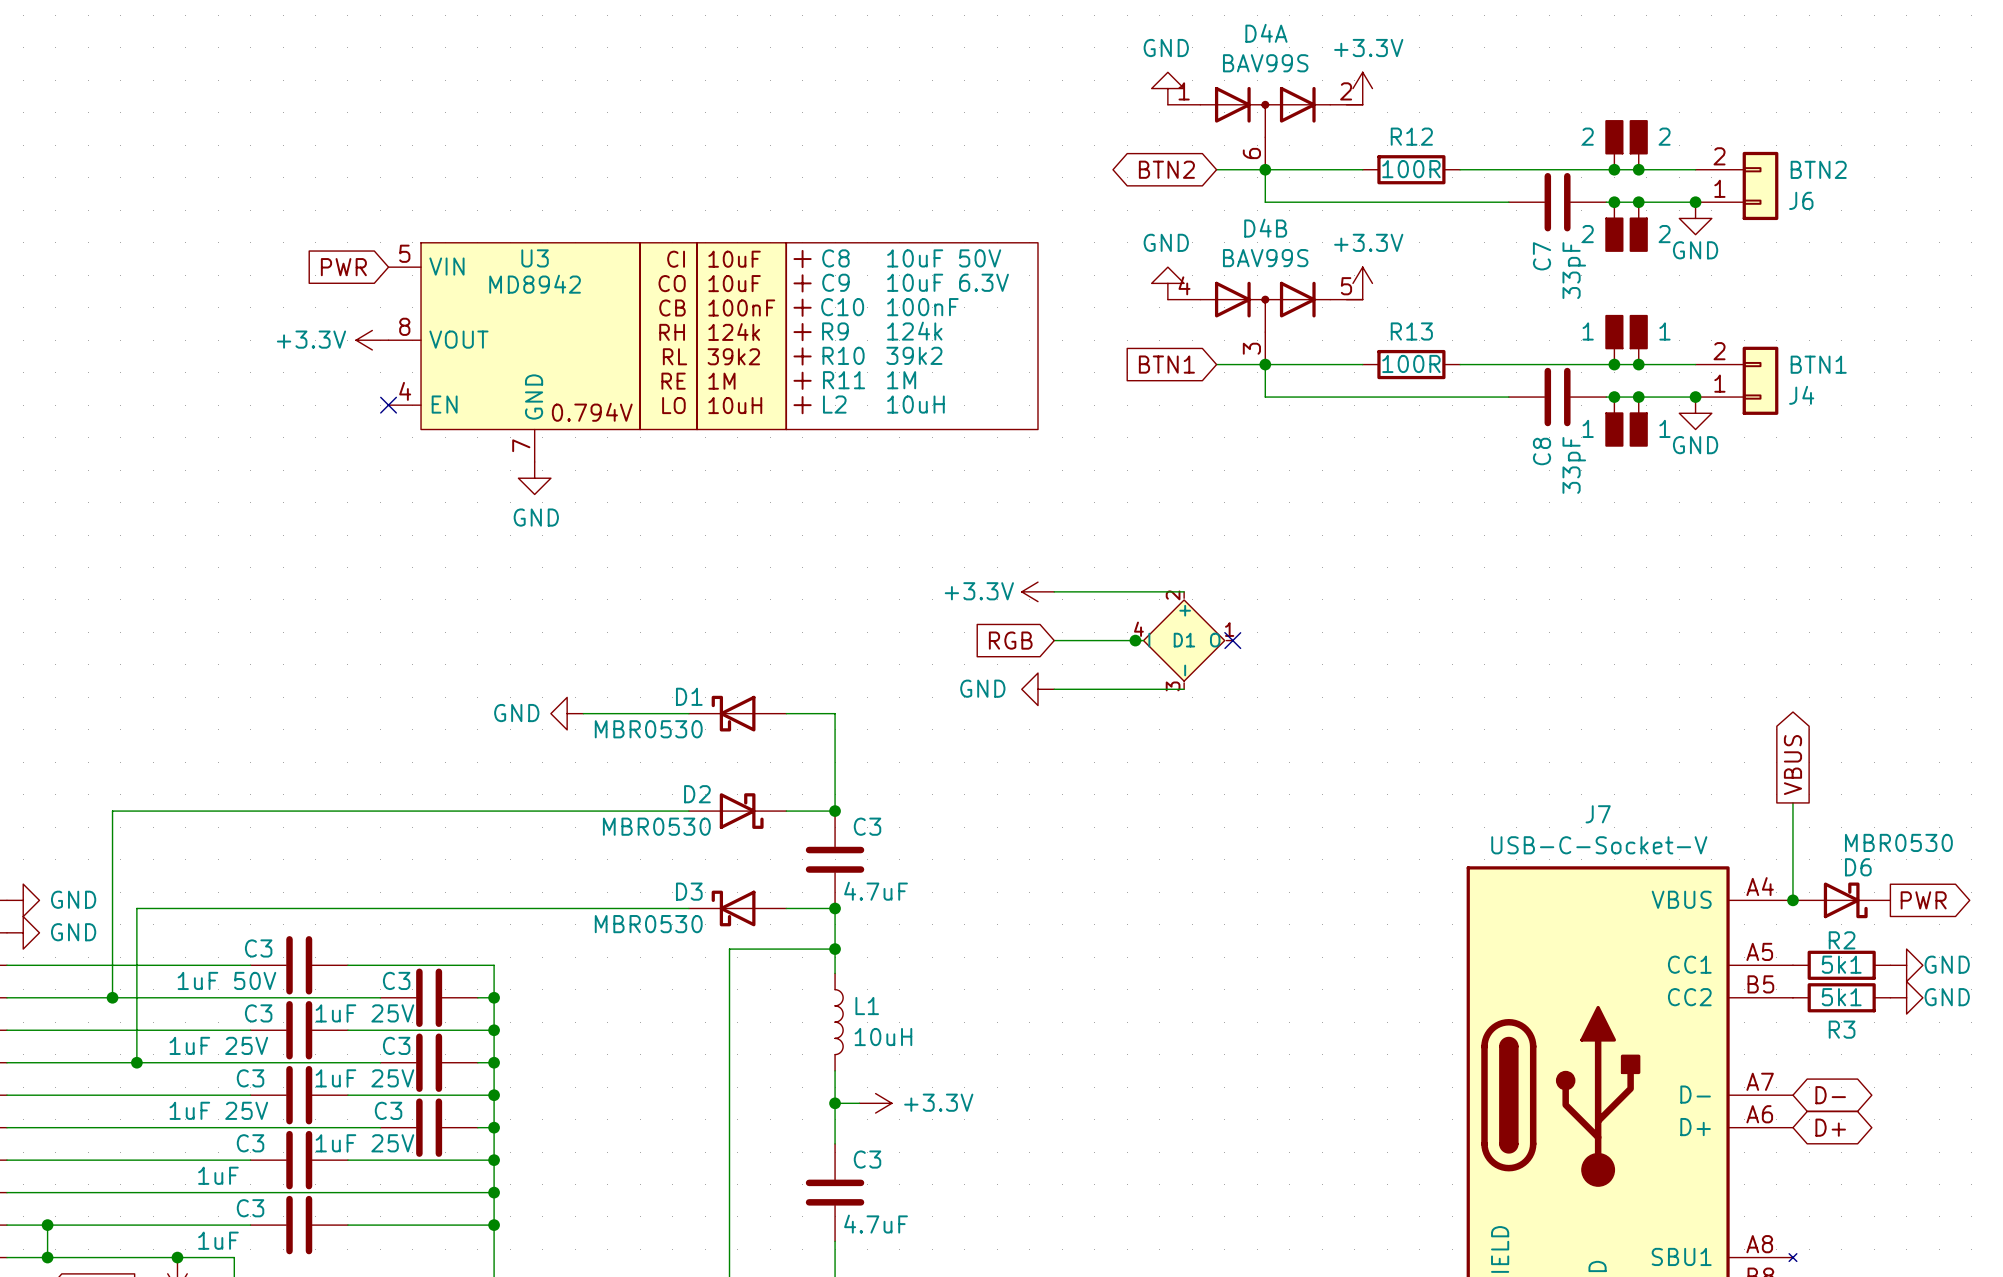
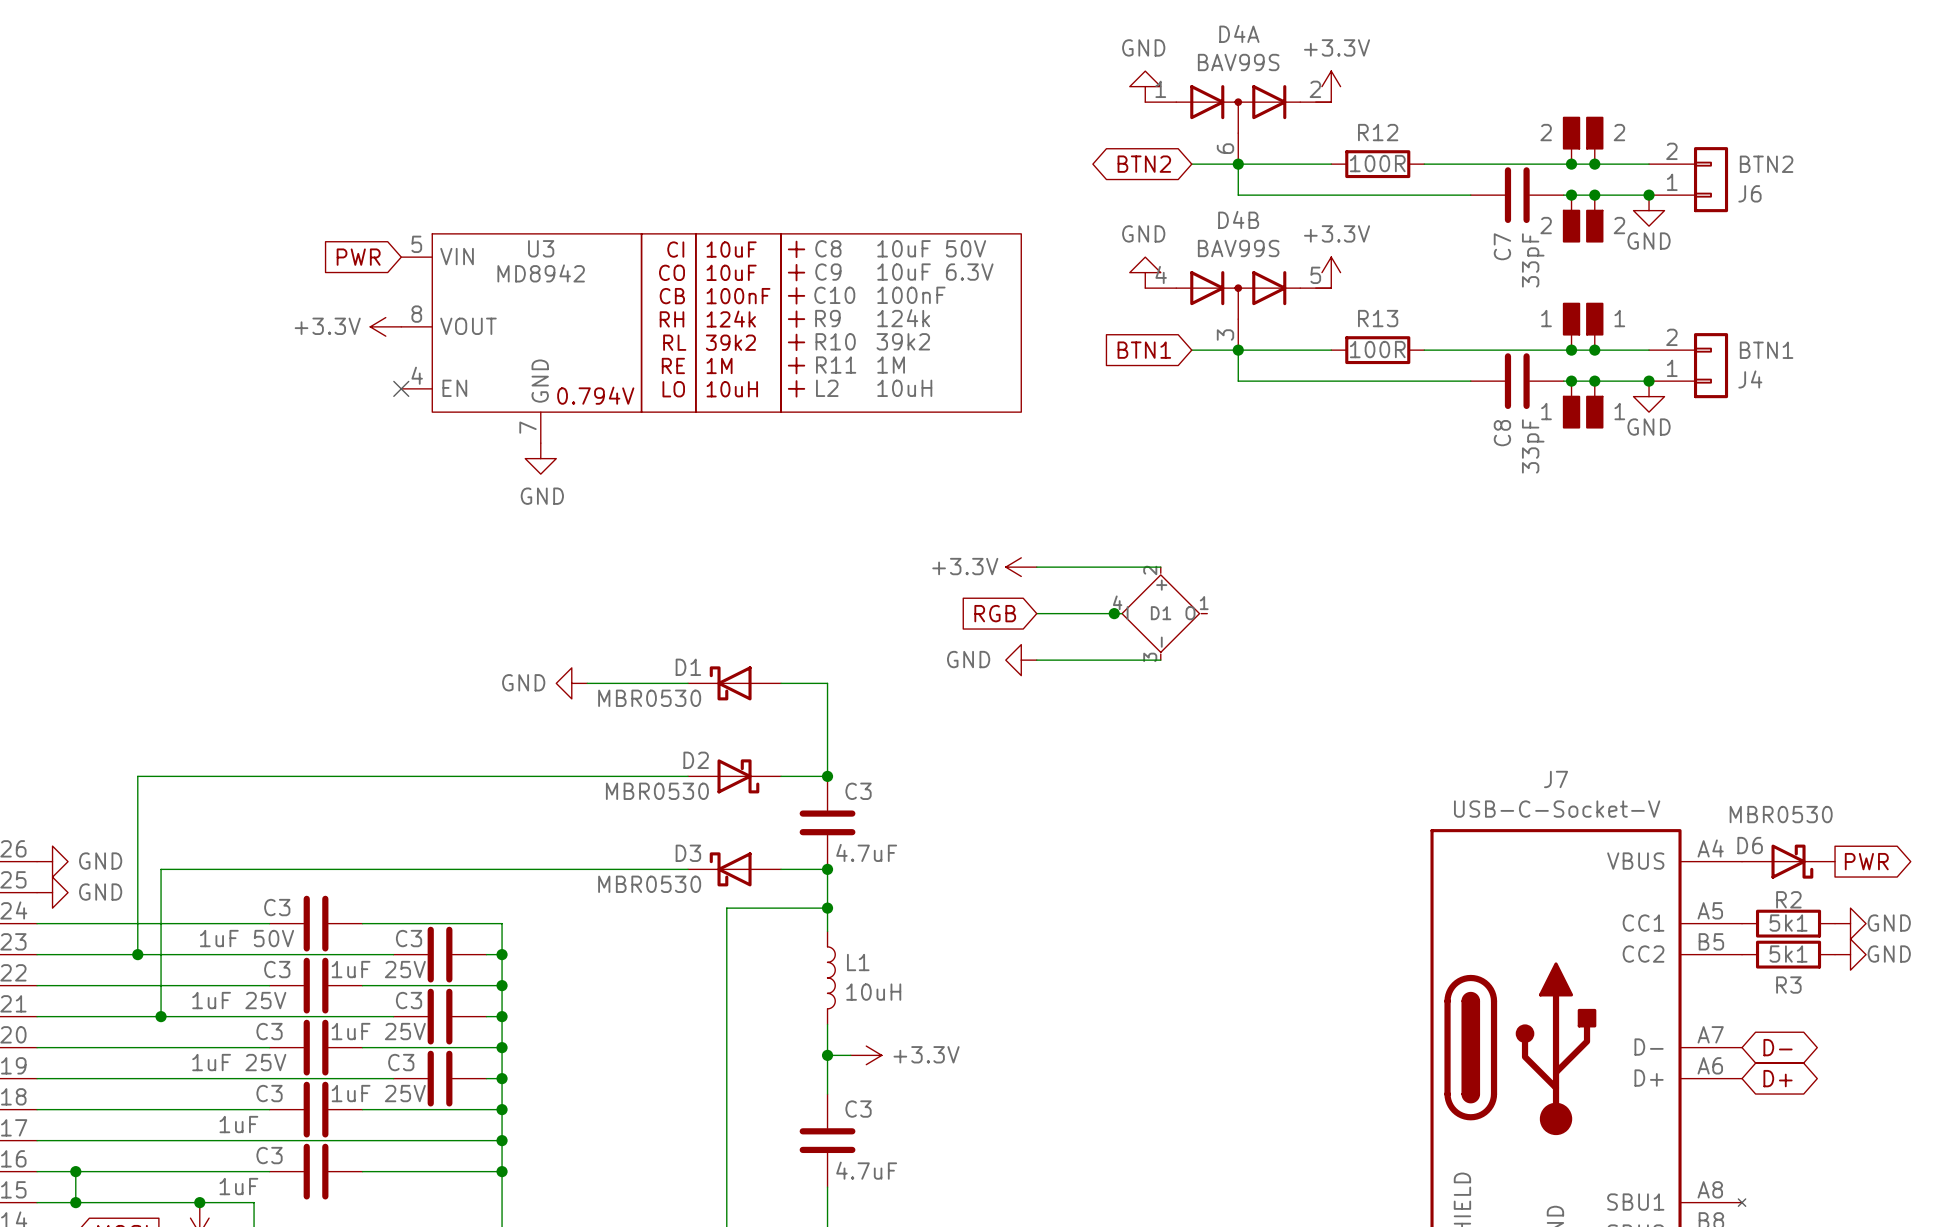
no-connect mark: (1232, 640) -> none
global label: VBUS (1792, 765) -> none
wire: (1792, 802) (1792, 900) -> none
D6 value position: MBR0530 (1898, 842) -> MBR0530 (1781, 814)
D6 name position: D6 (1858, 867) -> D6 (1750, 845)
junction: (1792, 900) -> none

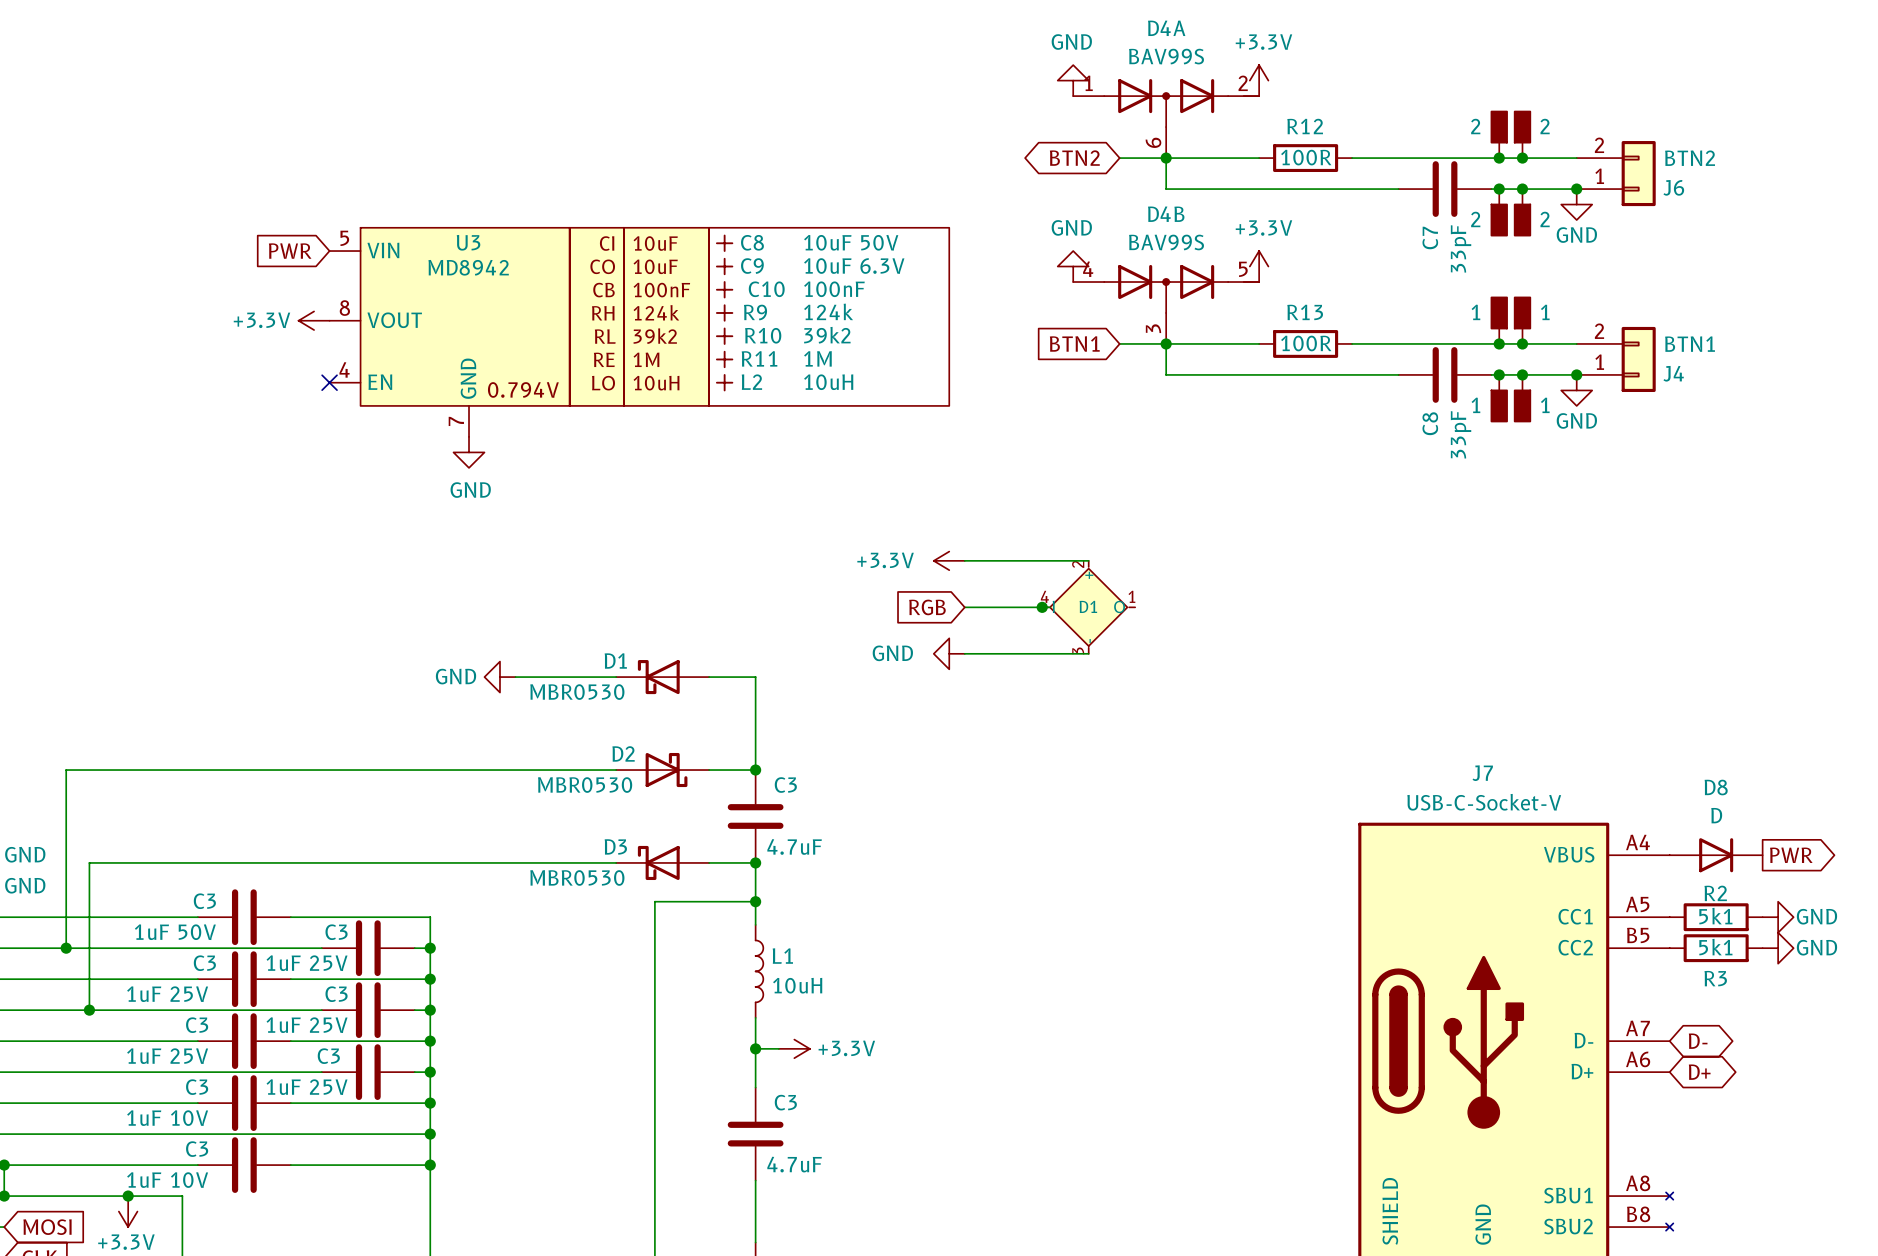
D6: MBR0530 (1788, 861) -> none
D8: none -> D (1716, 855)
C3 value: 1uF (238, 1124) -> 1uF 10V (167, 1118)
C3 value: 1uF (238, 1186) -> 1uF 10V (167, 1180)

